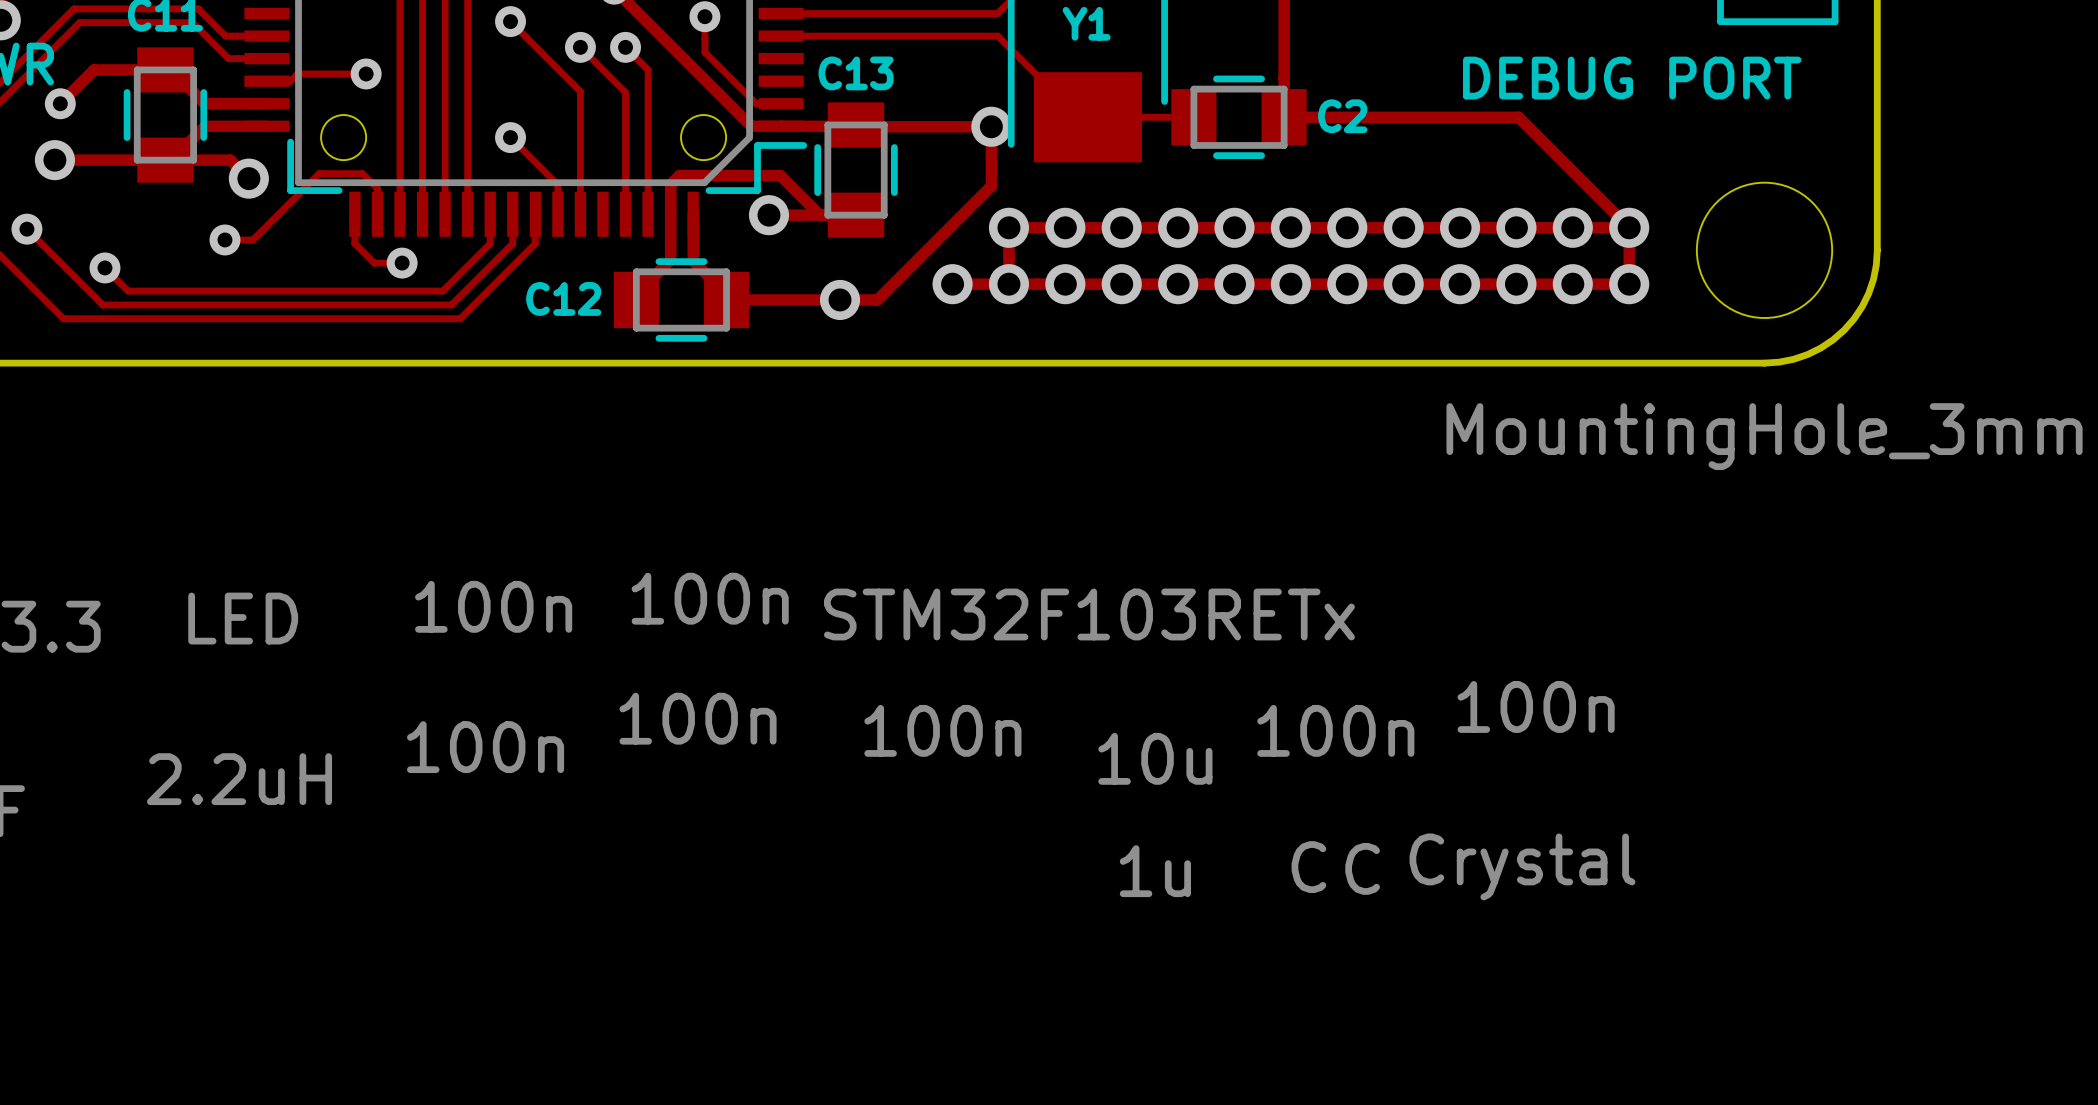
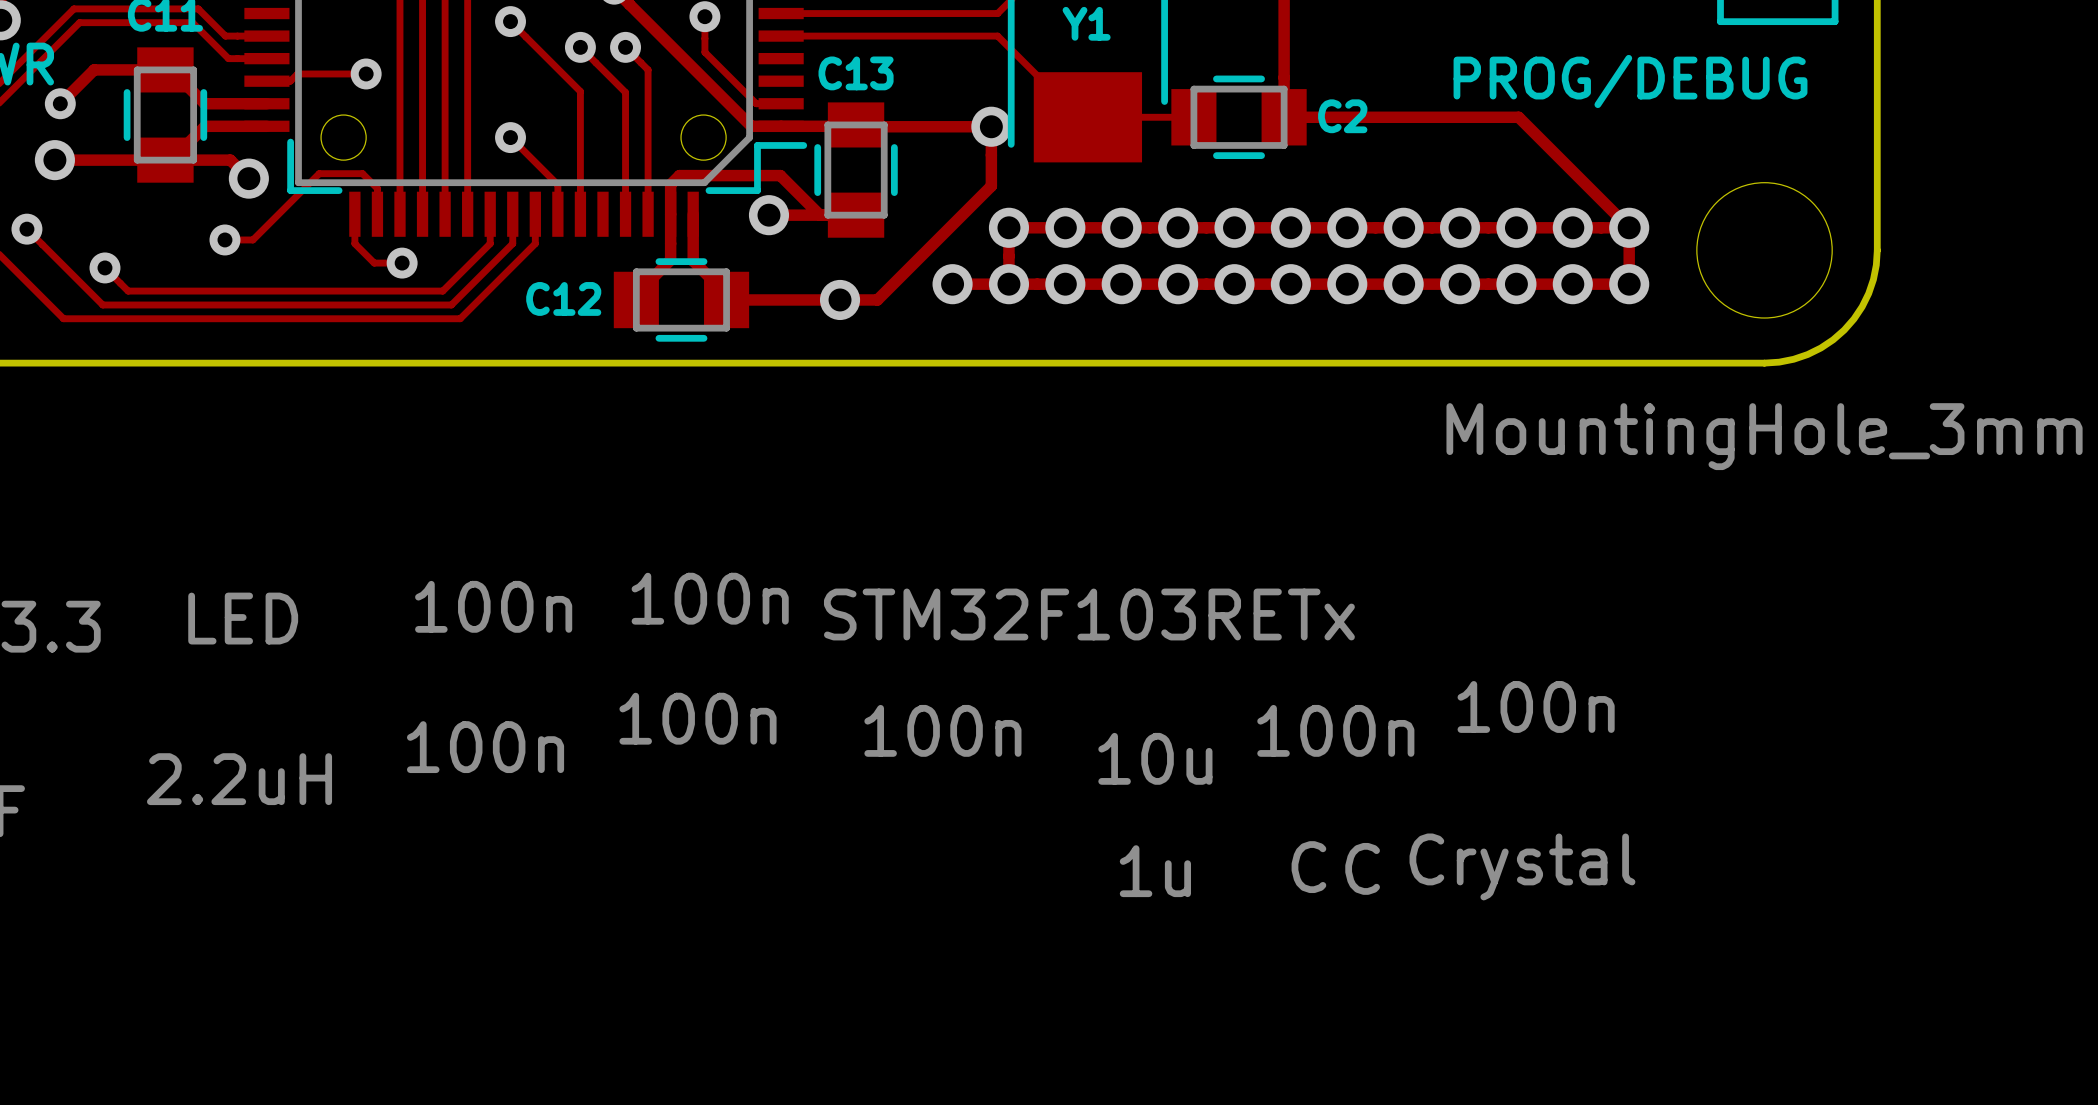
text: DEBUG PORT (1632, 78) -> PROG/DEBUG (1630, 81)

